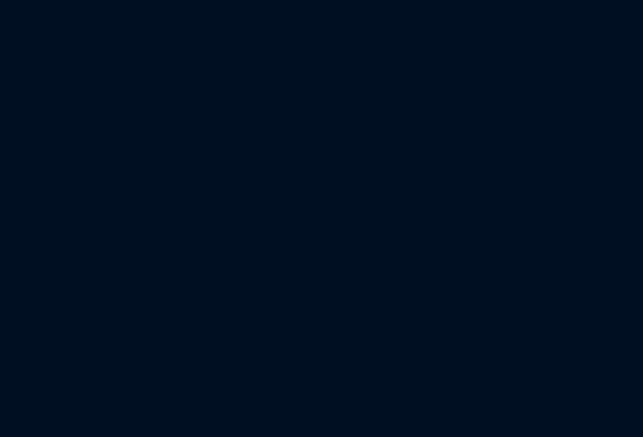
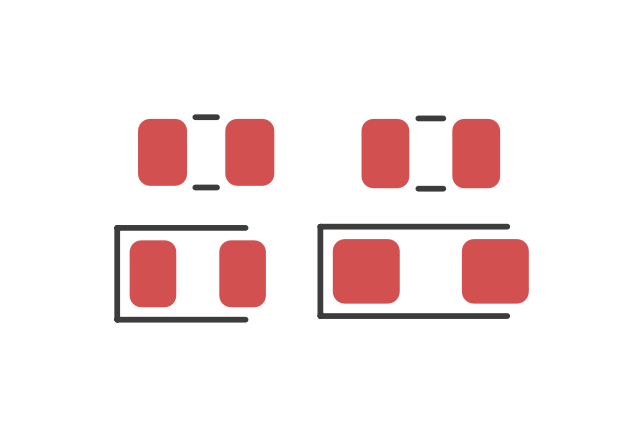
part: none -> (206, 152)
part: none -> (430, 153)
part: none -> (423, 271)
part: none -> (190, 273)

